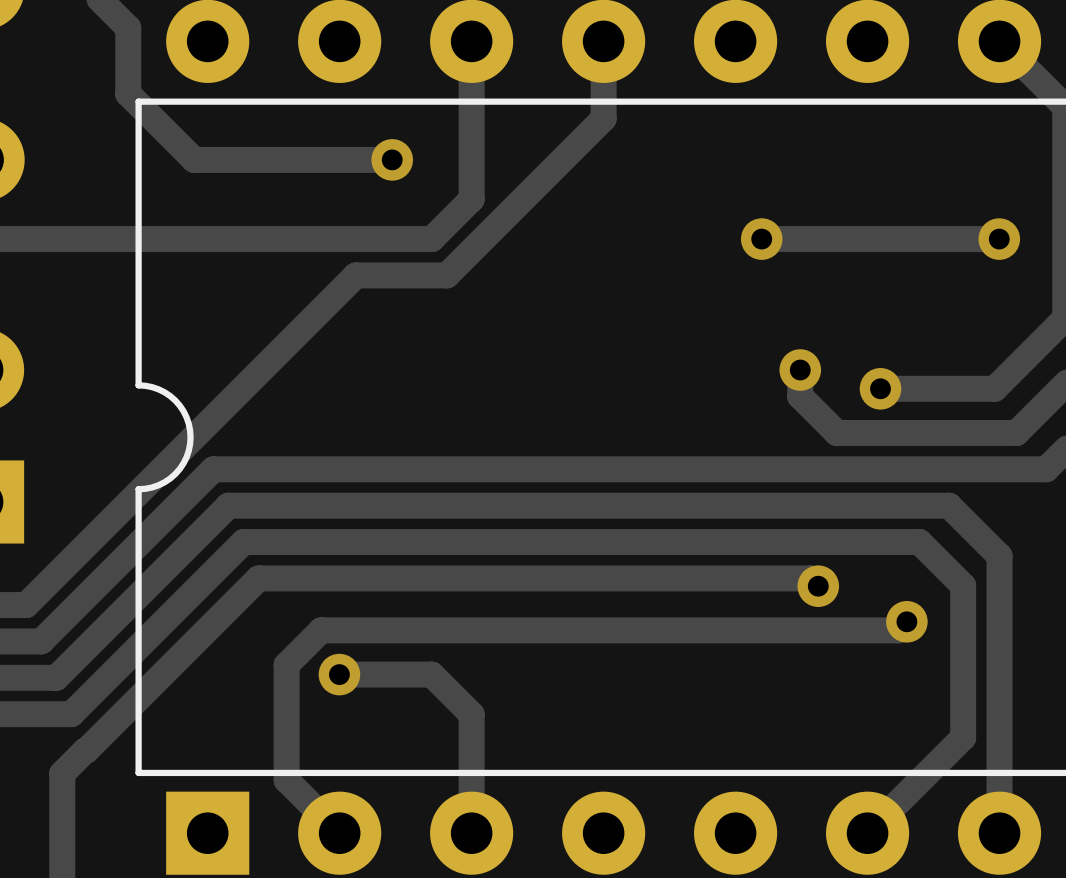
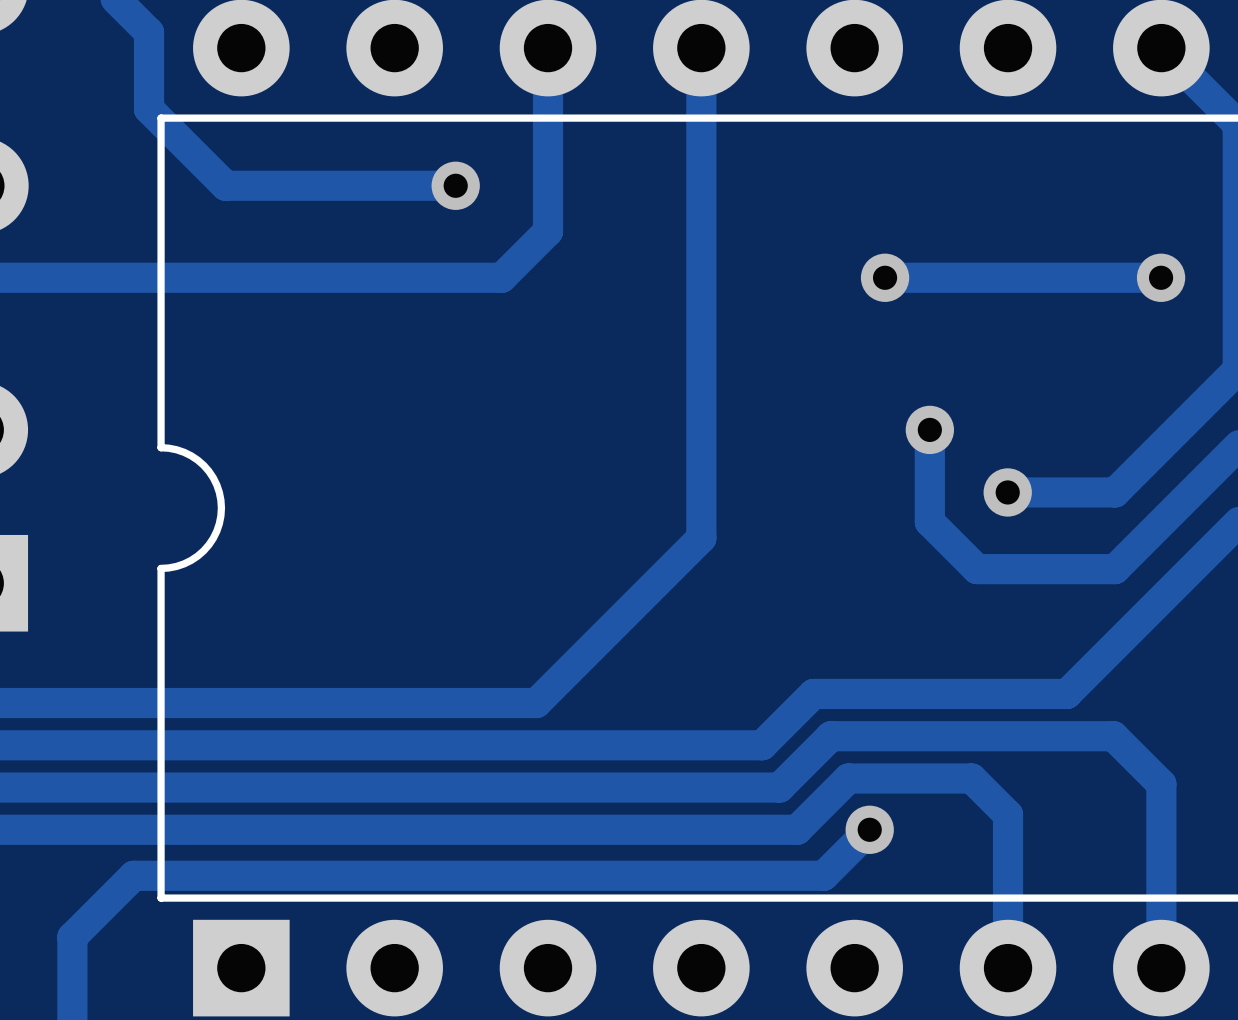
track: (603, 118) (446, 275) (355, 275) (26, 605) -> (701, 137) (701, 538) (536, 703) (30, 703)
track: (880, 388) (994, 388) -> (1007, 492) (1115, 492) (1155, 451)
via position: (880, 388) -> (1007, 492)
track: (800, 396) (836, 432) (1016, 432) -> (929, 460) (929, 521) (977, 569) (1115, 569) (1181, 503)
track: (1046, 469) (213, 469) (41, 641) -> (1215, 545) (1066, 693) (813, 693) (762, 745) (47, 745)
track: (818, 586) (810, 578) (258, 578) (62, 773) (62, 806) -> (869, 829) (823, 875) (133, 875) (72, 937)
via: (818, 586) -> none
track: (906, 621) (898, 630) (321, 630) (286, 664) (286, 780) (339, 833) -> none
via: (906, 621) -> none
track: (339, 674) (431, 674) (471, 714) (471, 833) -> none
via: (339, 674) -> none
track: (999, 674) (999, 556) (949, 505) (228, 505) (56, 677) -> (1161, 784) (1113, 736) (830, 736) (779, 787) (65, 787)
track: (71, 714) (243, 542) (919, 542) (963, 585) (963, 737) (867, 833) -> (82, 829) (797, 829) (848, 778) (971, 778) (1008, 814) (1008, 968)
via: none -> (869, 829)

